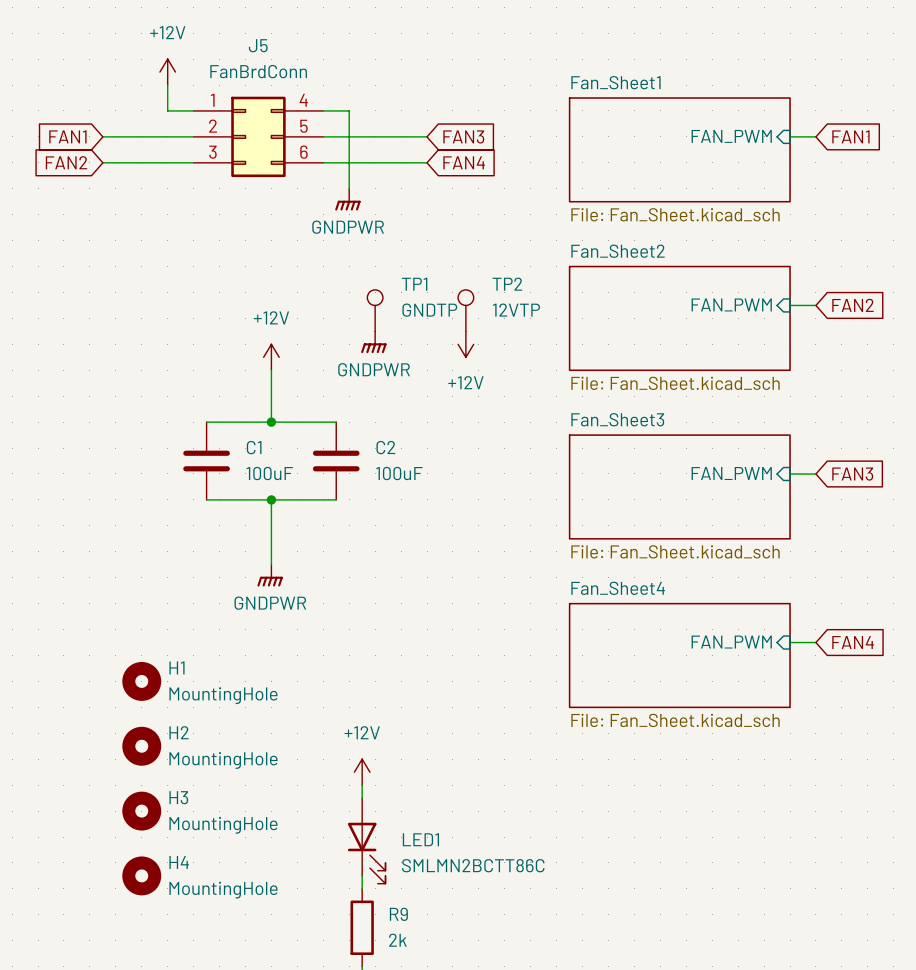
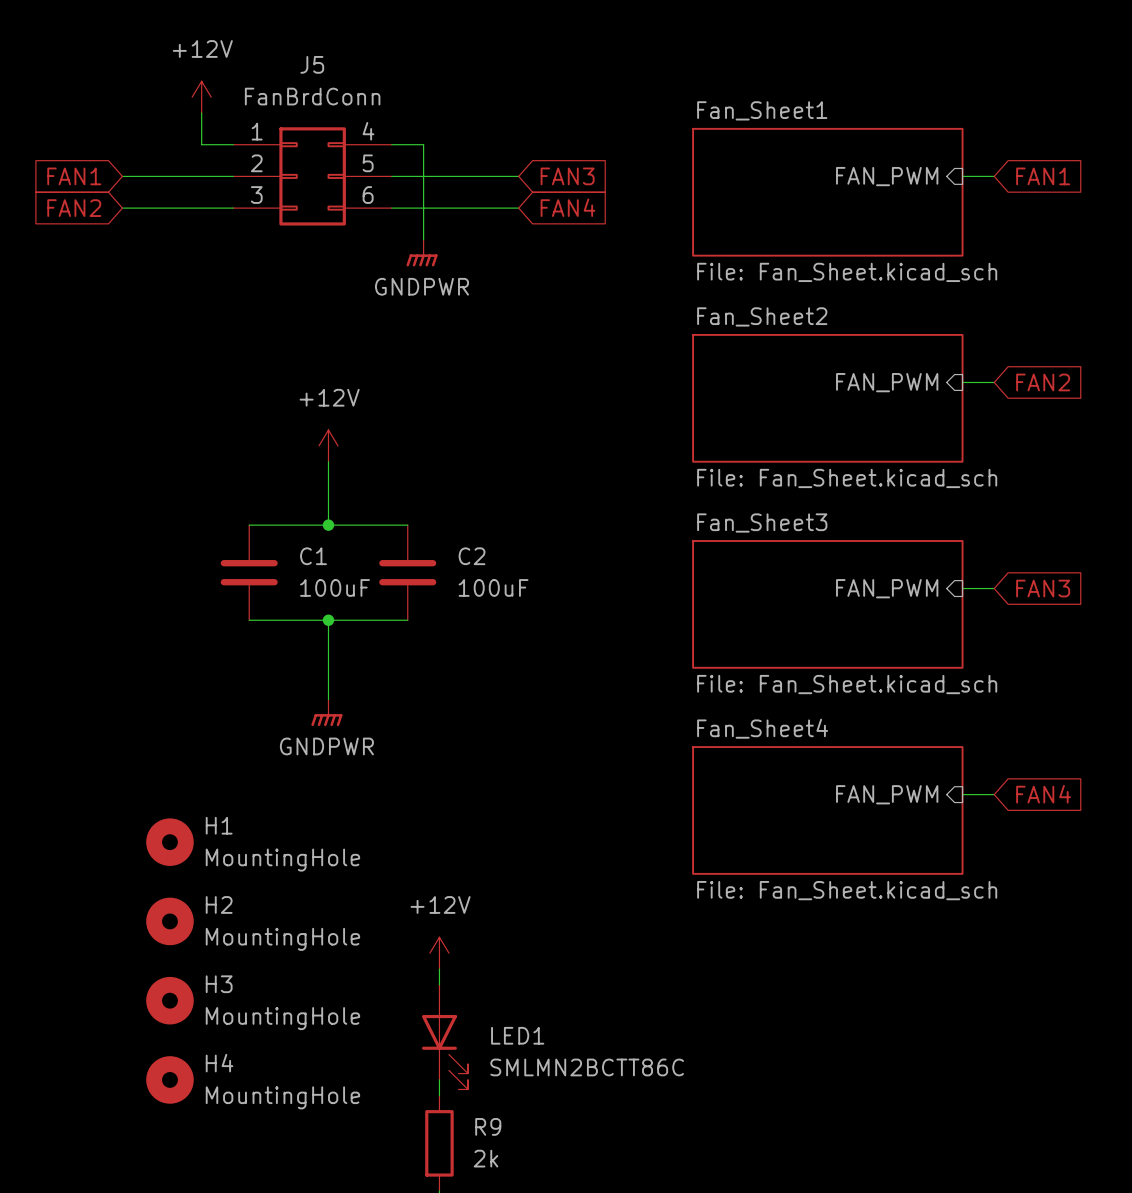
TP1: GNDTP (375, 310) -> none
TP2: 12VTP (465, 310) -> none
power symbol: GNDPWR (373, 342) -> none
power symbol: +12V (465, 344) -> none

